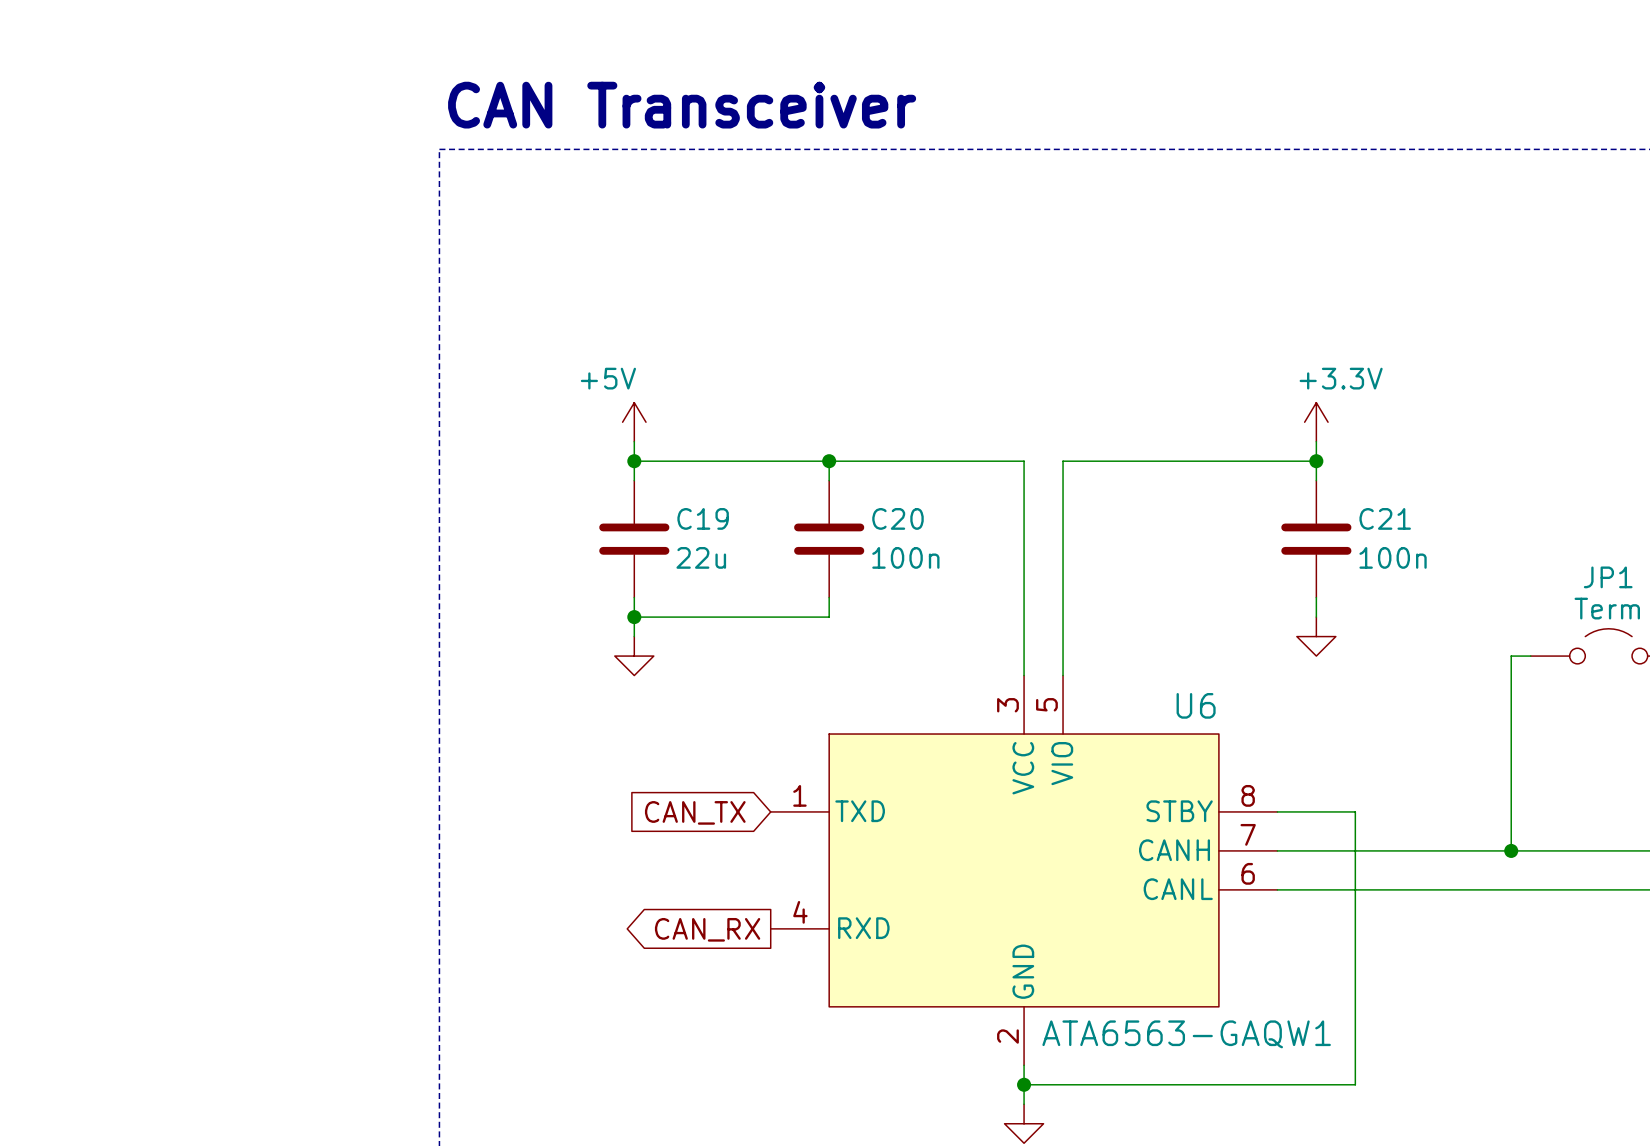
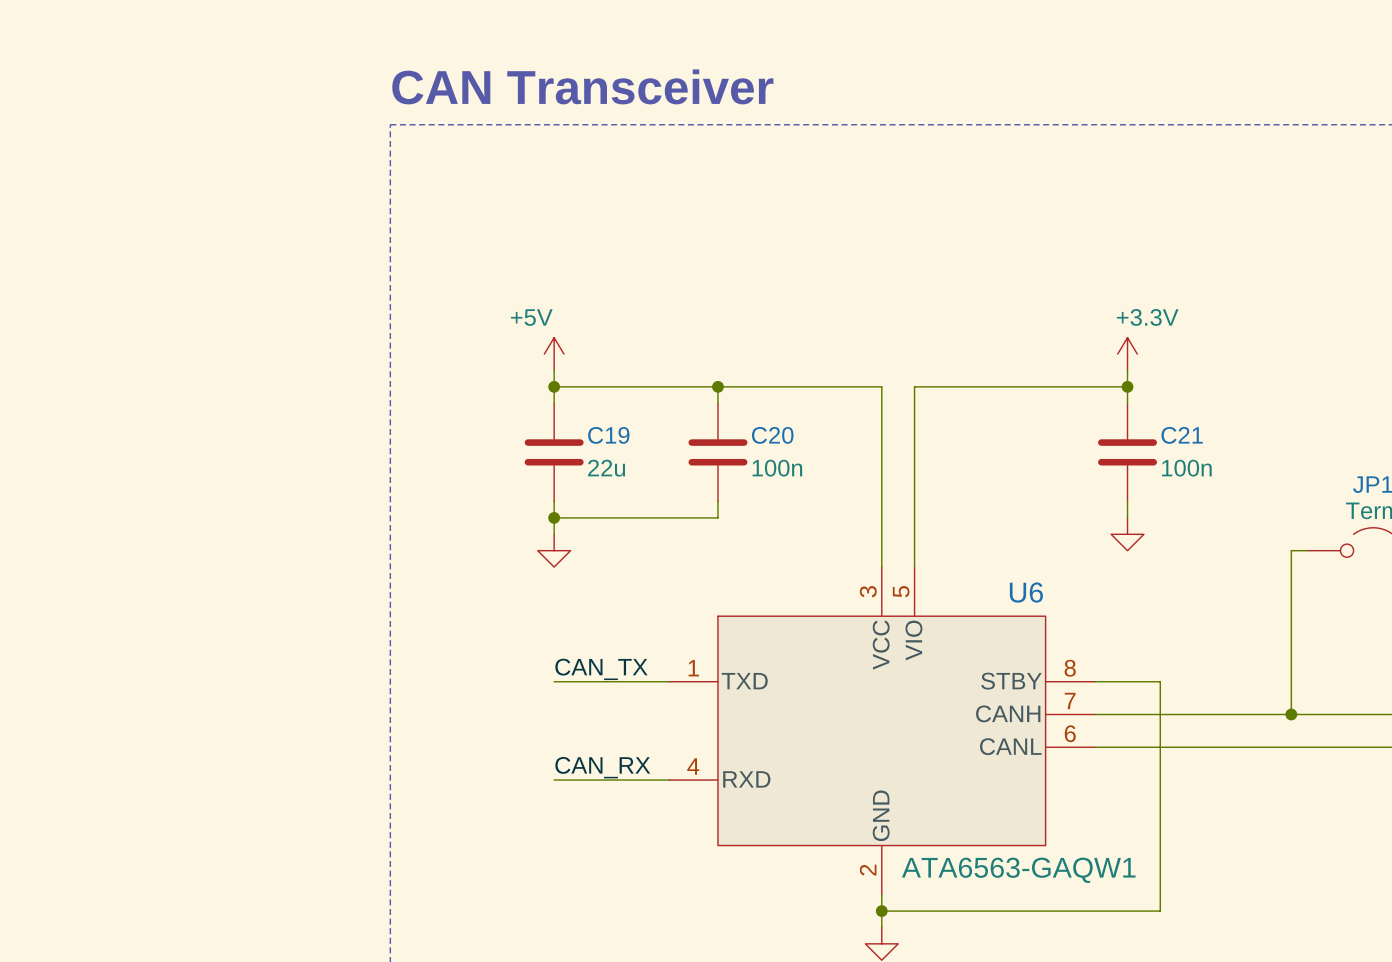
label: none -> CAN_TX (601, 669)
wire: none -> (554, 681) (668, 681)
global label: CAN_TX (695, 812) -> none
label: none -> CAN_RX (602, 767)
wire: none -> (554, 780) (668, 780)
global label: CAN_RX (707, 929) -> none

